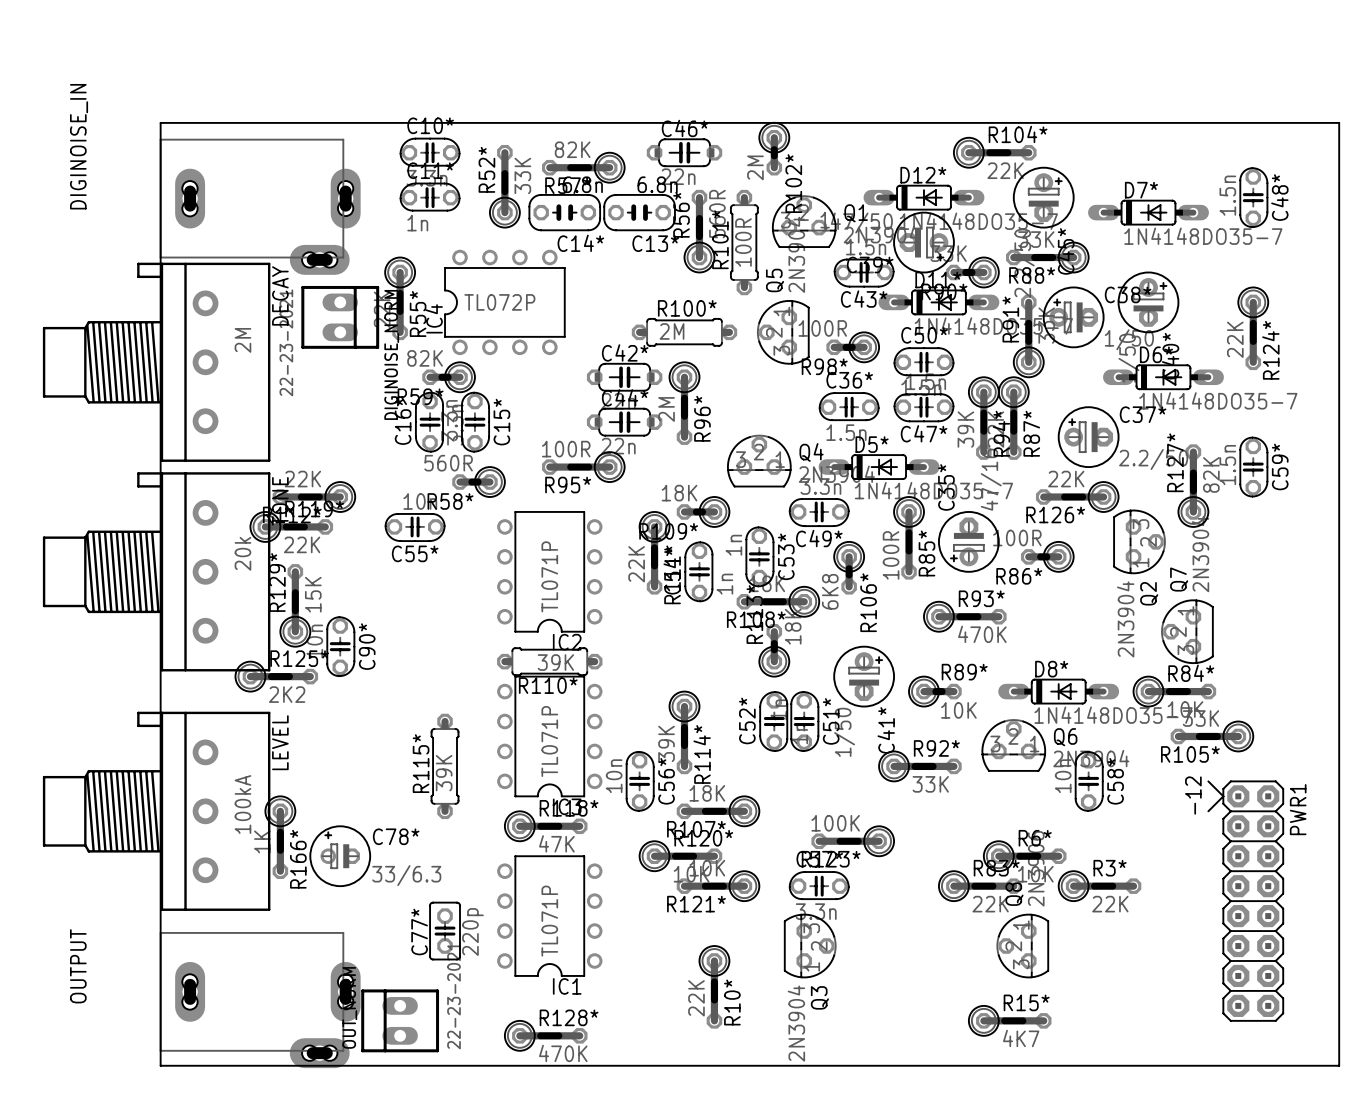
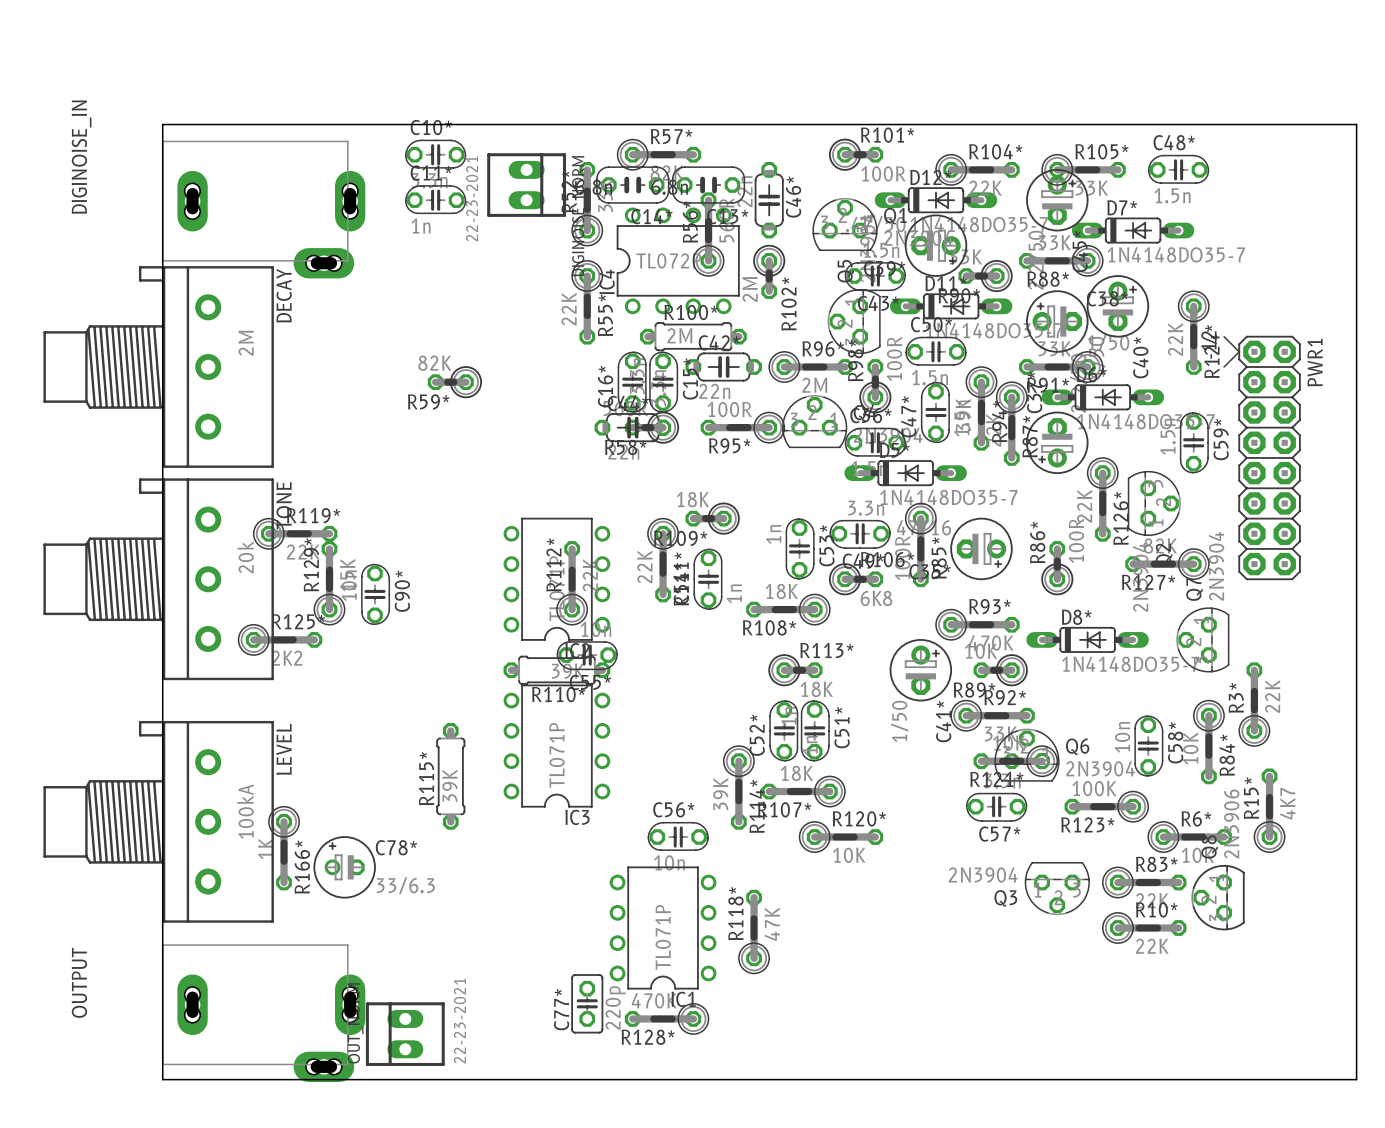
R102* position: (774, 148) -> (769, 271)
C46* rotation: 0° (684, 152) -> 90° clockwise (769, 200)
C46* position: (684, 152) -> (769, 200)
R104* position: (994, 152) -> (977, 169)
R57* rotation: 0° (583, 167) -> 180° (659, 154)
R57* position: (583, 167) -> (659, 154)
R52* position: (504, 186) -> (587, 204)
R101* footprint: [730, 189, 759, 296] -> [828, 138, 884, 171]
C48* rotation: 0° (1253, 197) -> 90° counterclockwise (1178, 169)
C48* position: (1253, 197) -> (1178, 169)
C14* position: (564, 212) -> (632, 185)
C13* position: (639, 212) -> (708, 185)
D7* position: (1148, 212) -> (1133, 230)
Q1 position: (804, 221) -> (844, 224)
R101* name position: R101* (720, 239) -> R101* (887, 135)
R101* value position: 100R (743, 242) -> 100R (883, 173)
R55* position: (400, 298) -> (587, 302)
IC4 position: (504, 302) -> (678, 260)
C40* position: (1148, 302) -> (1117, 306)
DIGINOISE_NORM position: (340, 317) -> (526, 185)
C38* position: (1073, 317) -> (1057, 321)
R124* position: (1253, 328) -> (1193, 332)
Q5 position: (783, 332) -> (854, 321)
R91* rotation: 0° (1028, 336) -> 90° counterclockwise (1061, 367)
R98* rotation: 0° (853, 347) -> 90° clockwise (875, 386)
R98* position: (853, 347) -> (875, 386)
C50* position: (923, 361) -> (935, 351)
C42* position: (624, 377) -> (723, 367)
D6* position: (1163, 377) -> (1102, 397)
R96* rotation: 0° (684, 403) -> 90° counterclockwise (810, 367)
R96* position: (684, 403) -> (810, 367)
C36* position: (849, 406) -> (875, 442)
C47* rotation: 0° (923, 407) -> 90° clockwise (935, 412)
R94* position: (983, 418) -> (981, 408)
R87* position: (1013, 418) -> (1011, 423)
C16* position: (429, 422) -> (632, 382)
C15* position: (475, 422) -> (663, 382)
C37* rotation: 0° (1088, 437) -> 90° counterclockwise (1057, 442)
C37* position: (1088, 437) -> (1057, 442)
Q4 position: (759, 461) -> (814, 421)
R95* position: (583, 467) -> (742, 427)
D5* position: (879, 467) -> (905, 473)
C59* position: (1253, 467) -> (1194, 442)
R58* position: (479, 482) -> (652, 427)
R127* rotation: 0° (1193, 485) -> 90° counterclockwise (1167, 564)
R127* position: (1193, 485) -> (1167, 564)
R112* rotation: 0° (314, 497) -> 90° clockwise (572, 583)
R112* position: (314, 497) -> (572, 583)
R126* rotation: 0° (1077, 497) -> 90° counterclockwise (1102, 499)
C49* position: (819, 512) -> (860, 534)
C55* position: (415, 527) -> (587, 655)
C35* rotation: 0° (968, 541) -> 90° counterclockwise (981, 548)
Q2 position: (1139, 541) -> (1154, 503)
C53* position: (759, 556) -> (800, 548)
R86* rotation: 0° (1047, 556) -> 90° clockwise (1057, 568)
R106* rotation: 0° (849, 567) -> 90° counterclockwise (856, 579)
R129* position: (295, 605) -> (329, 583)
C90* position: (340, 646) -> (375, 594)
R113* rotation: 0° (774, 650) -> 90° clockwise (795, 670)
R125* position: (276, 676) -> (280, 639)
C41* position: (864, 676) -> (920, 670)
R89* rotation: 0° (934, 691) -> 180° (1000, 670)
R89* position: (934, 691) -> (1000, 670)
D8* position: (1058, 691) -> (1087, 639)
R84* rotation: 0° (1174, 691) -> 90° clockwise (1208, 742)
R114* position: (684, 732) -> (738, 787)
R105* rotation: 0° (1212, 736) -> 180° (1083, 169)
R105* position: (1212, 736) -> (1083, 169)
R92* position: (920, 766) -> (992, 715)
C56* rotation: 0° (640, 781) -> 90° counterclockwise (678, 836)
C56* position: (640, 781) -> (678, 836)
C58* position: (1089, 781) -> (1148, 746)
R107* position: (718, 811) -> (803, 791)
R118* rotation: 0° (545, 826) -> 90° counterclockwise (754, 931)
R118* position: (545, 826) -> (754, 931)
R123* position: (853, 841) -> (1106, 806)
R120* position: (680, 856) -> (841, 837)
R6* position: (1024, 856) -> (1189, 837)
C57* rotation: 0° (819, 885) -> 180° (996, 807)
C57* position: (819, 885) -> (996, 807)
R121* position: (718, 886) -> (1015, 761)
R83* position: (979, 886) -> (1144, 882)
R3* rotation: 0° (1099, 886) -> 90° counterclockwise (1254, 704)
R3* position: (1099, 886) -> (1254, 704)
PWR1 position: (1245, 901) -> (1262, 457)
IC1 position: (549, 916) -> (663, 927)
C77* position: (445, 931) -> (587, 1003)
Q3 rotation: 0° (810, 946) -> 90° clockwise (1057, 888)
Q3 position: (810, 946) -> (1057, 888)
Q8 position: (1022, 946) -> (1218, 897)
R10* rotation: 0° (714, 987) -> 90° counterclockwise (1144, 927)
R10* position: (714, 987) -> (1144, 927)
R15* rotation: 0° (1009, 1020) -> 90° counterclockwise (1269, 810)
R15* position: (1009, 1020) -> (1269, 810)
R128* rotation: 0° (545, 1035) -> 180° (667, 1018)
R128* position: (545, 1035) -> (667, 1018)

